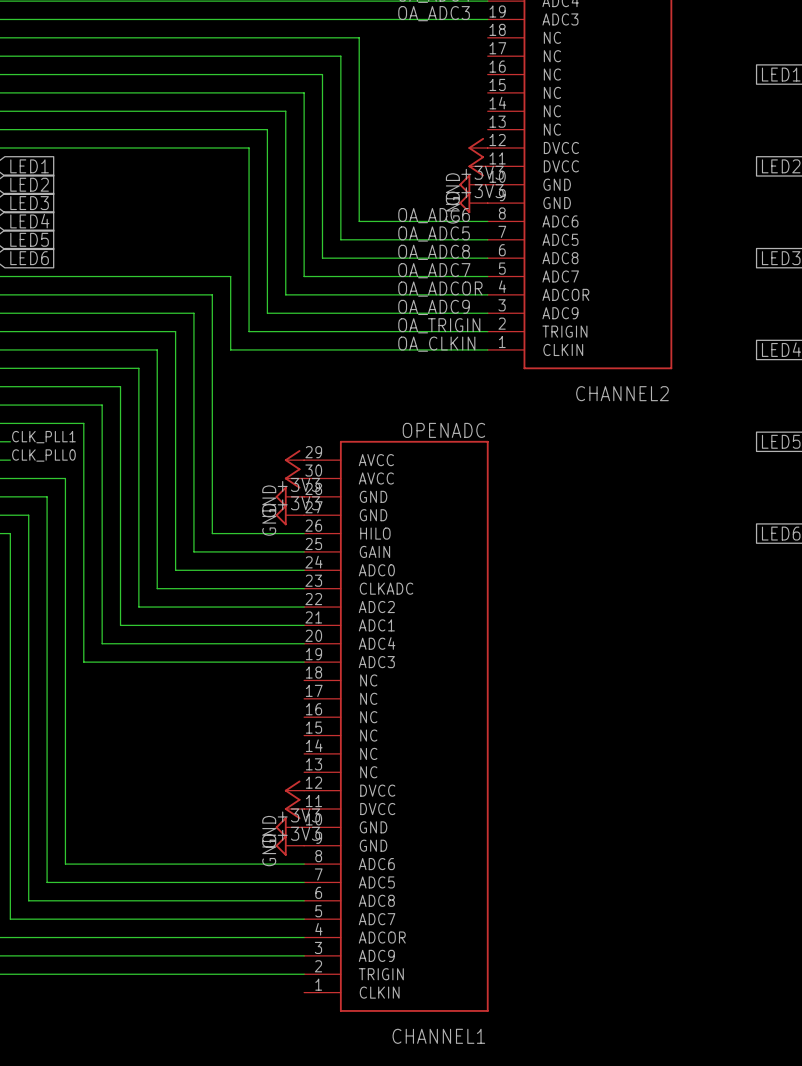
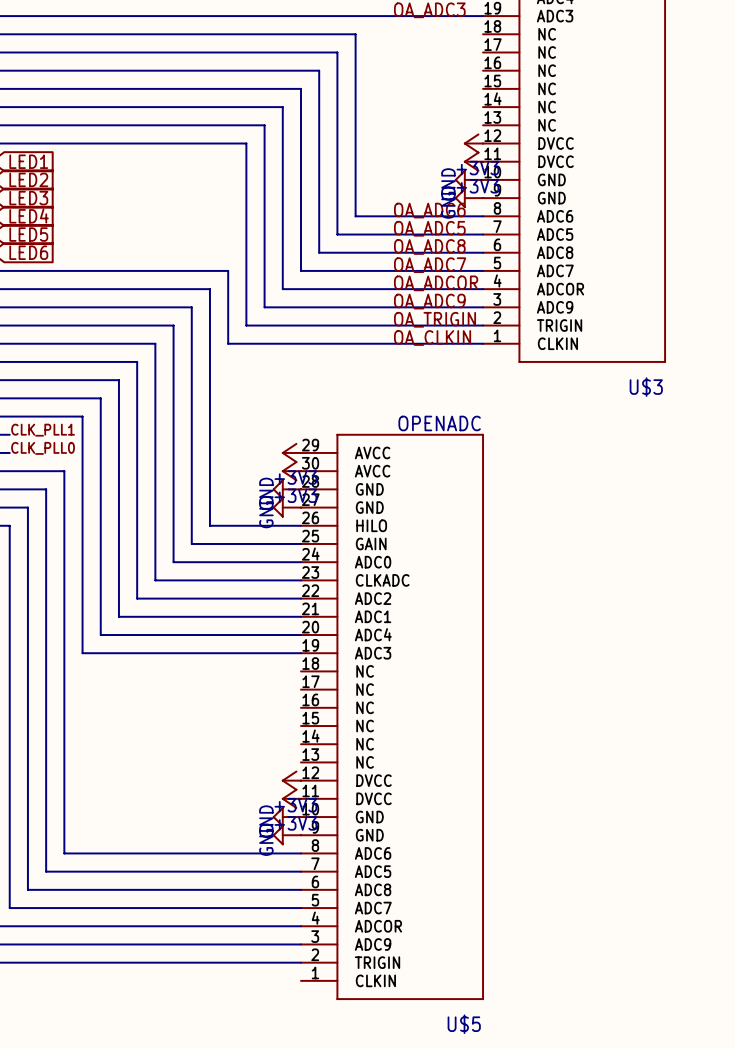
CHANNEL2 name: CHANNEL2 (622, 393) -> U$3 (646, 387)
CHANNEL1 name: CHANNEL1 (438, 1036) -> U$5 (464, 1024)

